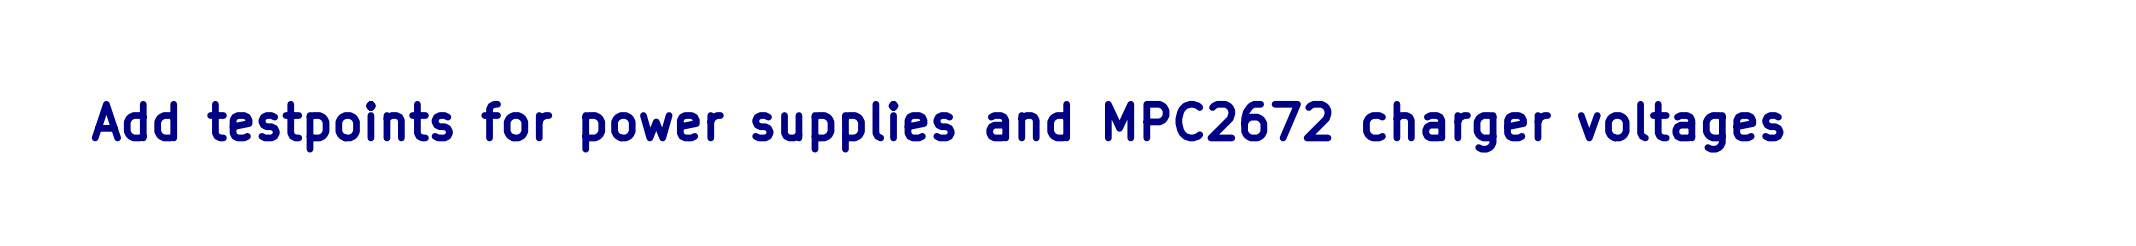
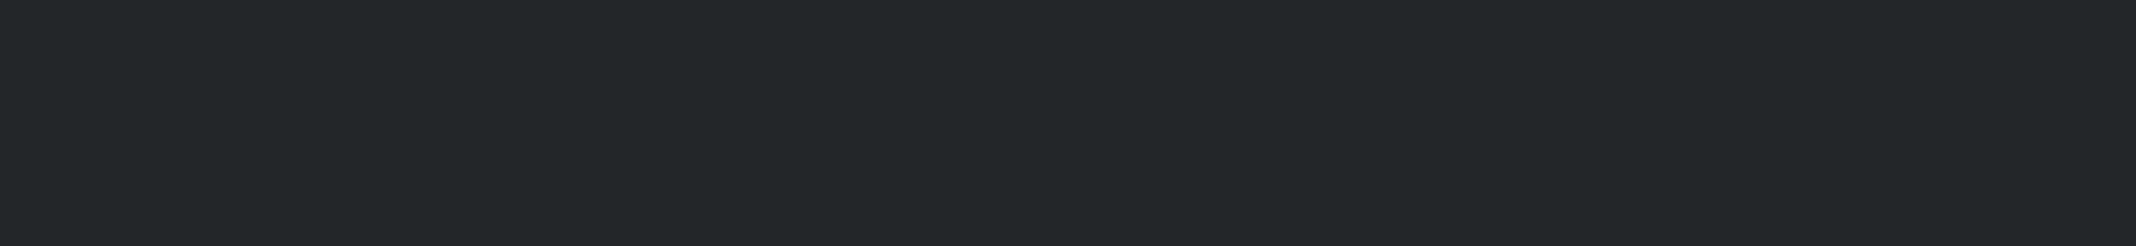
text: Add testpoints for power supplies and MPC2672 charger voltages (937, 126) -> none

